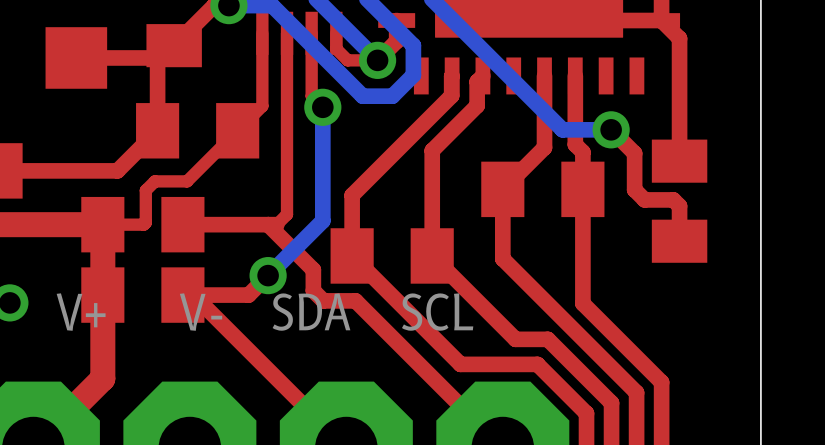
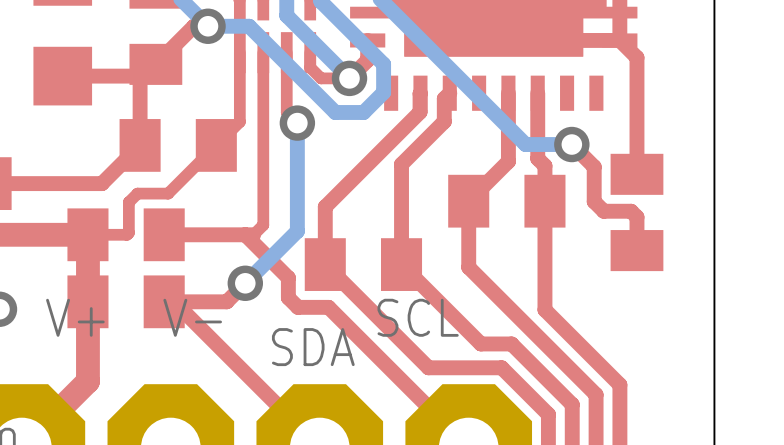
text position: SDA (311, 312) -> SDA (313, 347)

